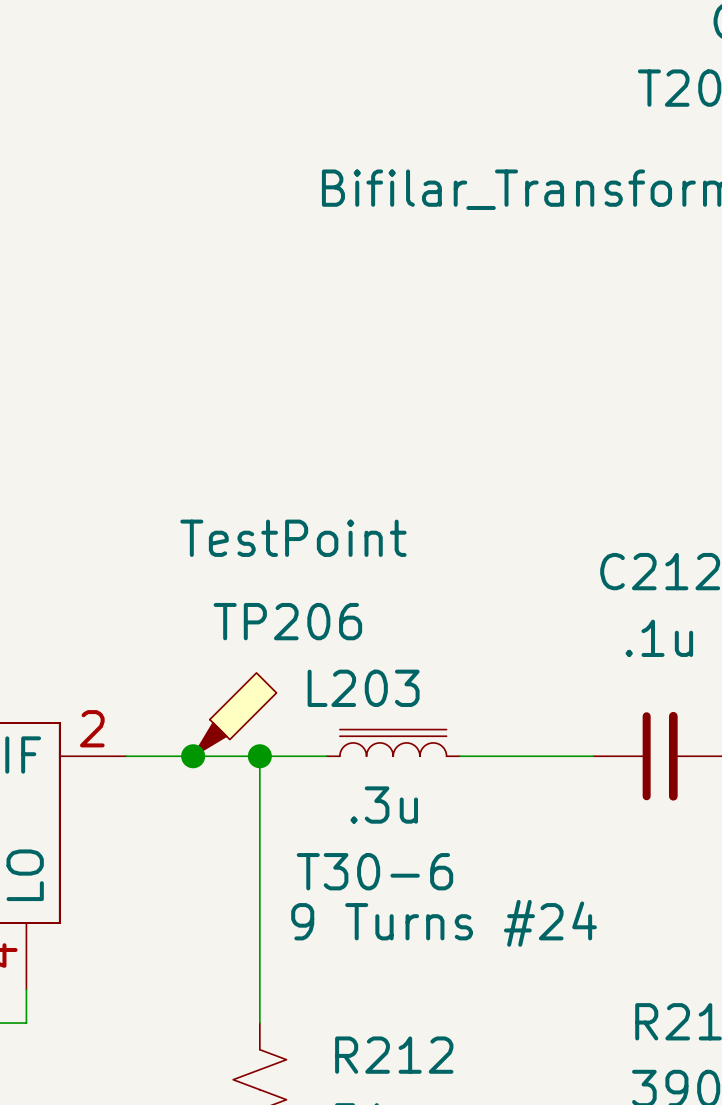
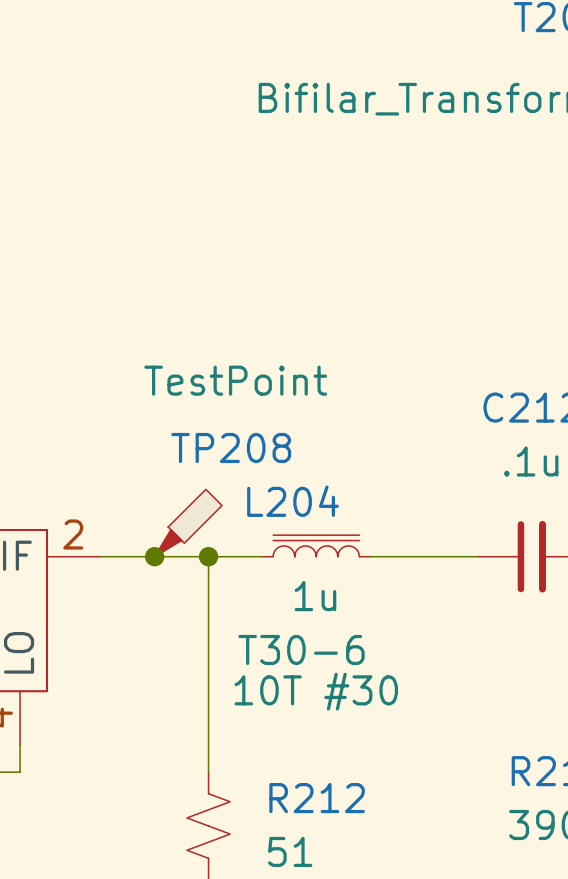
TP206 name: TP206 (287, 621) -> TP208 (231, 447)
L203 name: L203 (363, 688) -> L204 (292, 501)
L203 value: .3u (384, 805) -> 1u (315, 596)
L203 text: 9 Turns #24 (444, 923) -> 10T #30 (316, 691)

